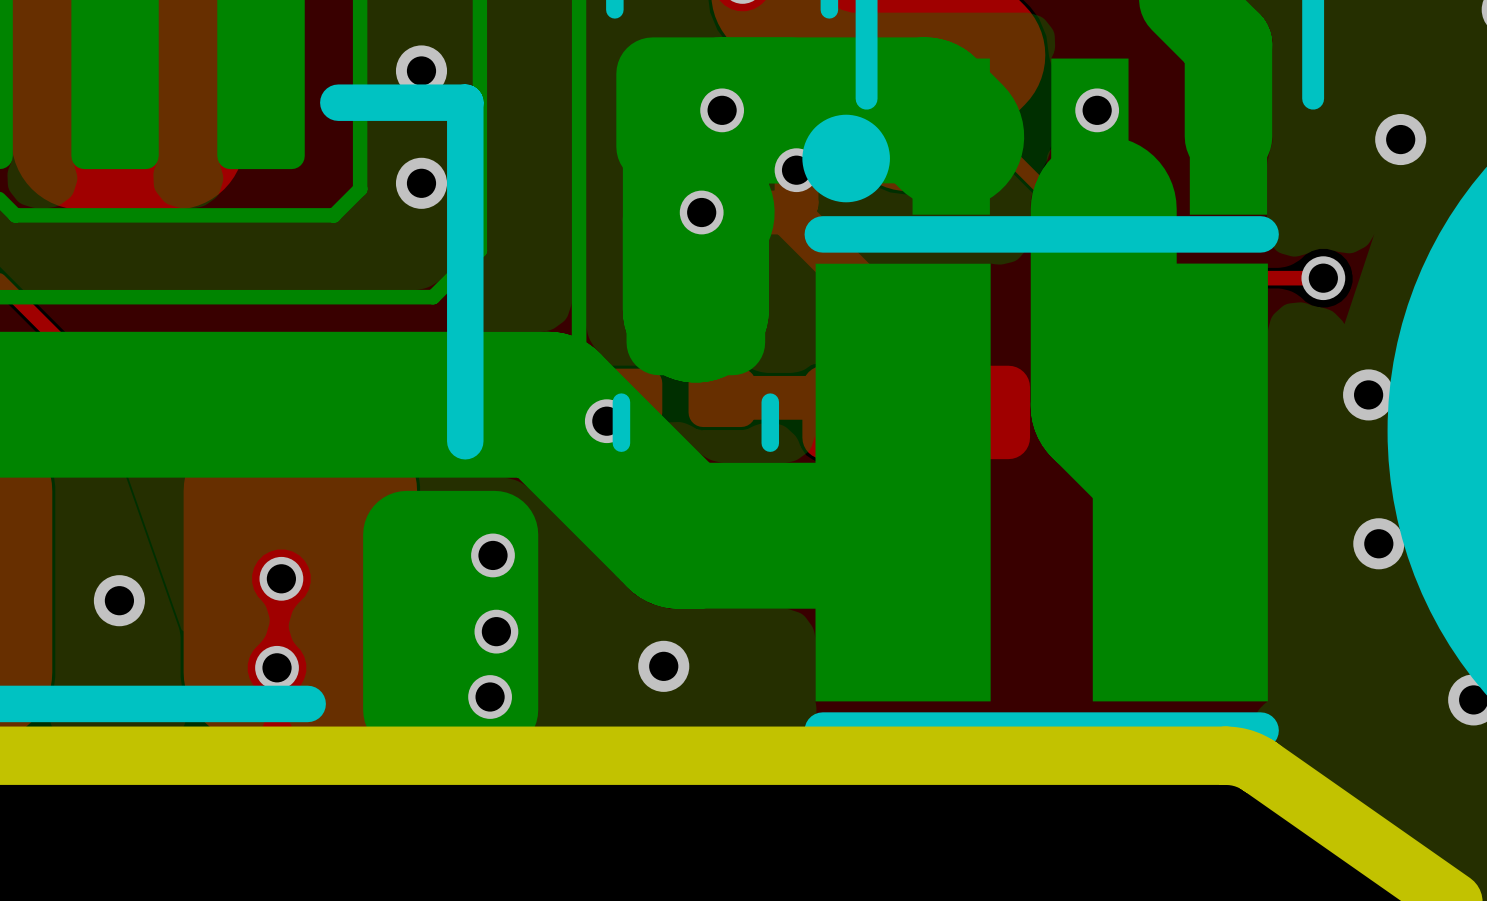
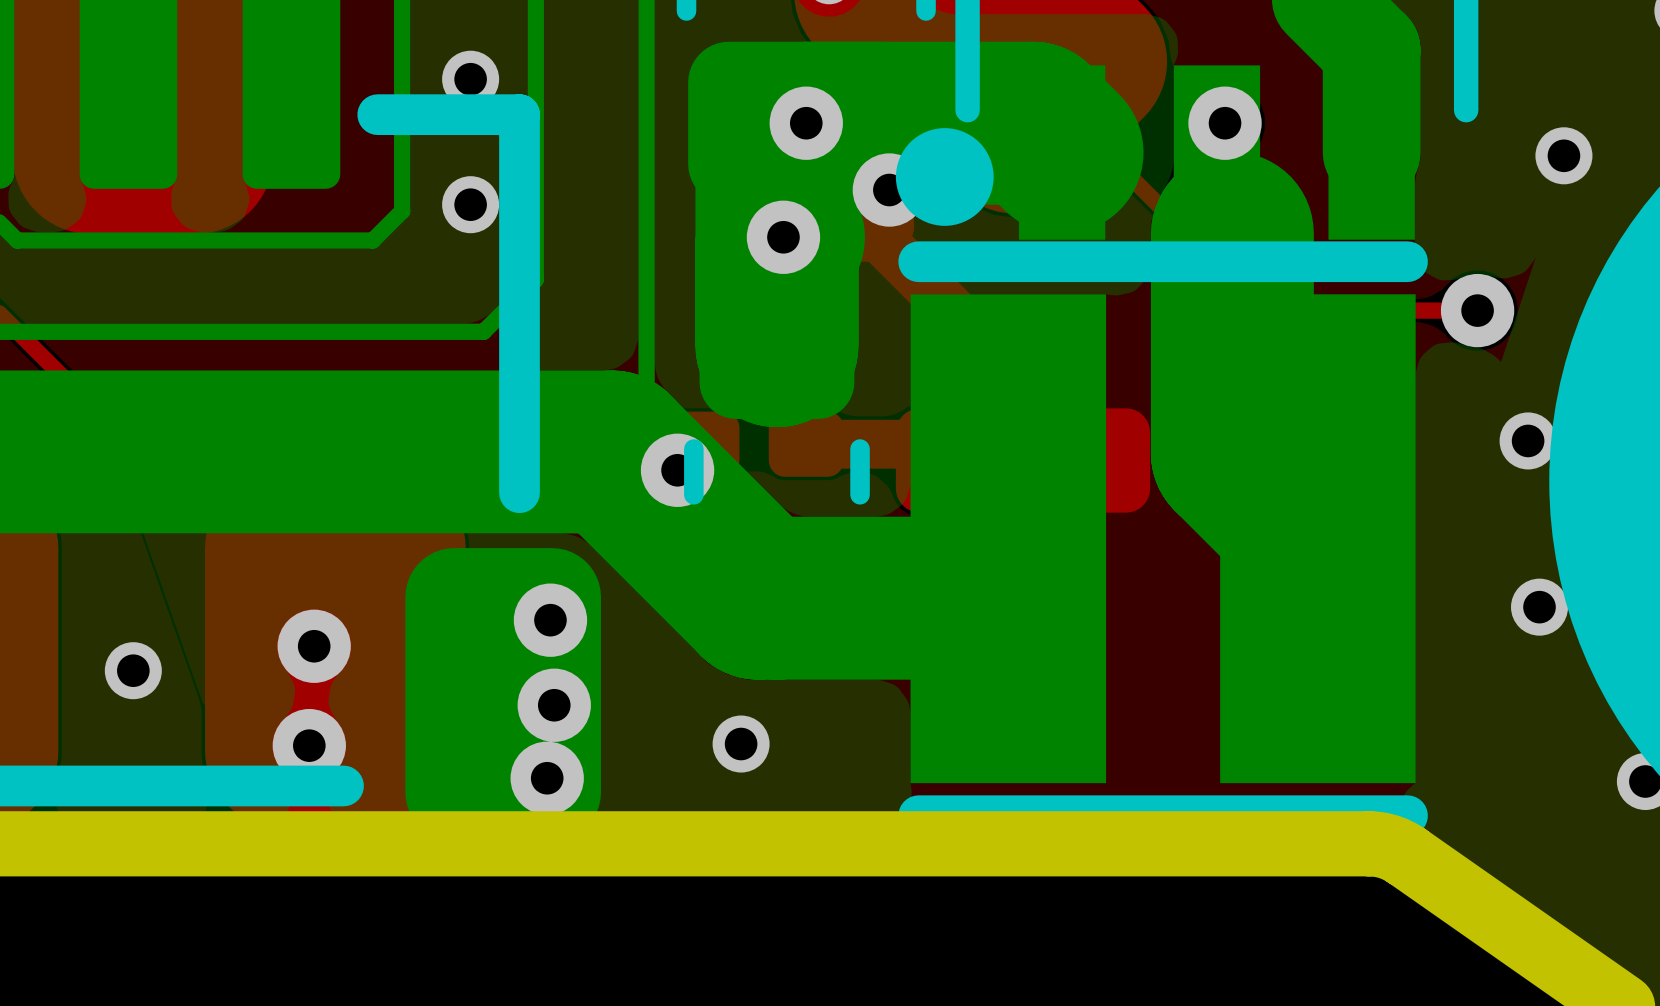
via size: [700, 88, 745, 133] -> [769, 86, 843, 160]
via size: [1075, 88, 1120, 133] -> [1188, 86, 1262, 160]
via size: [774, 148, 819, 193] -> [852, 153, 927, 227]
via size: [679, 190, 724, 235] -> [746, 200, 821, 274]
via size: [1301, 256, 1346, 301] -> [1440, 273, 1515, 348]
via size: [584, 399, 629, 444] -> [640, 433, 715, 507]
via size: [471, 533, 515, 578] -> [513, 583, 588, 657]
via size: [259, 556, 304, 601] -> [277, 609, 351, 683]
via size: [474, 609, 519, 654] -> [517, 668, 591, 742]
via size: [255, 645, 299, 690] -> [272, 708, 346, 783]
via size: [468, 675, 512, 719] -> [510, 741, 584, 815]

